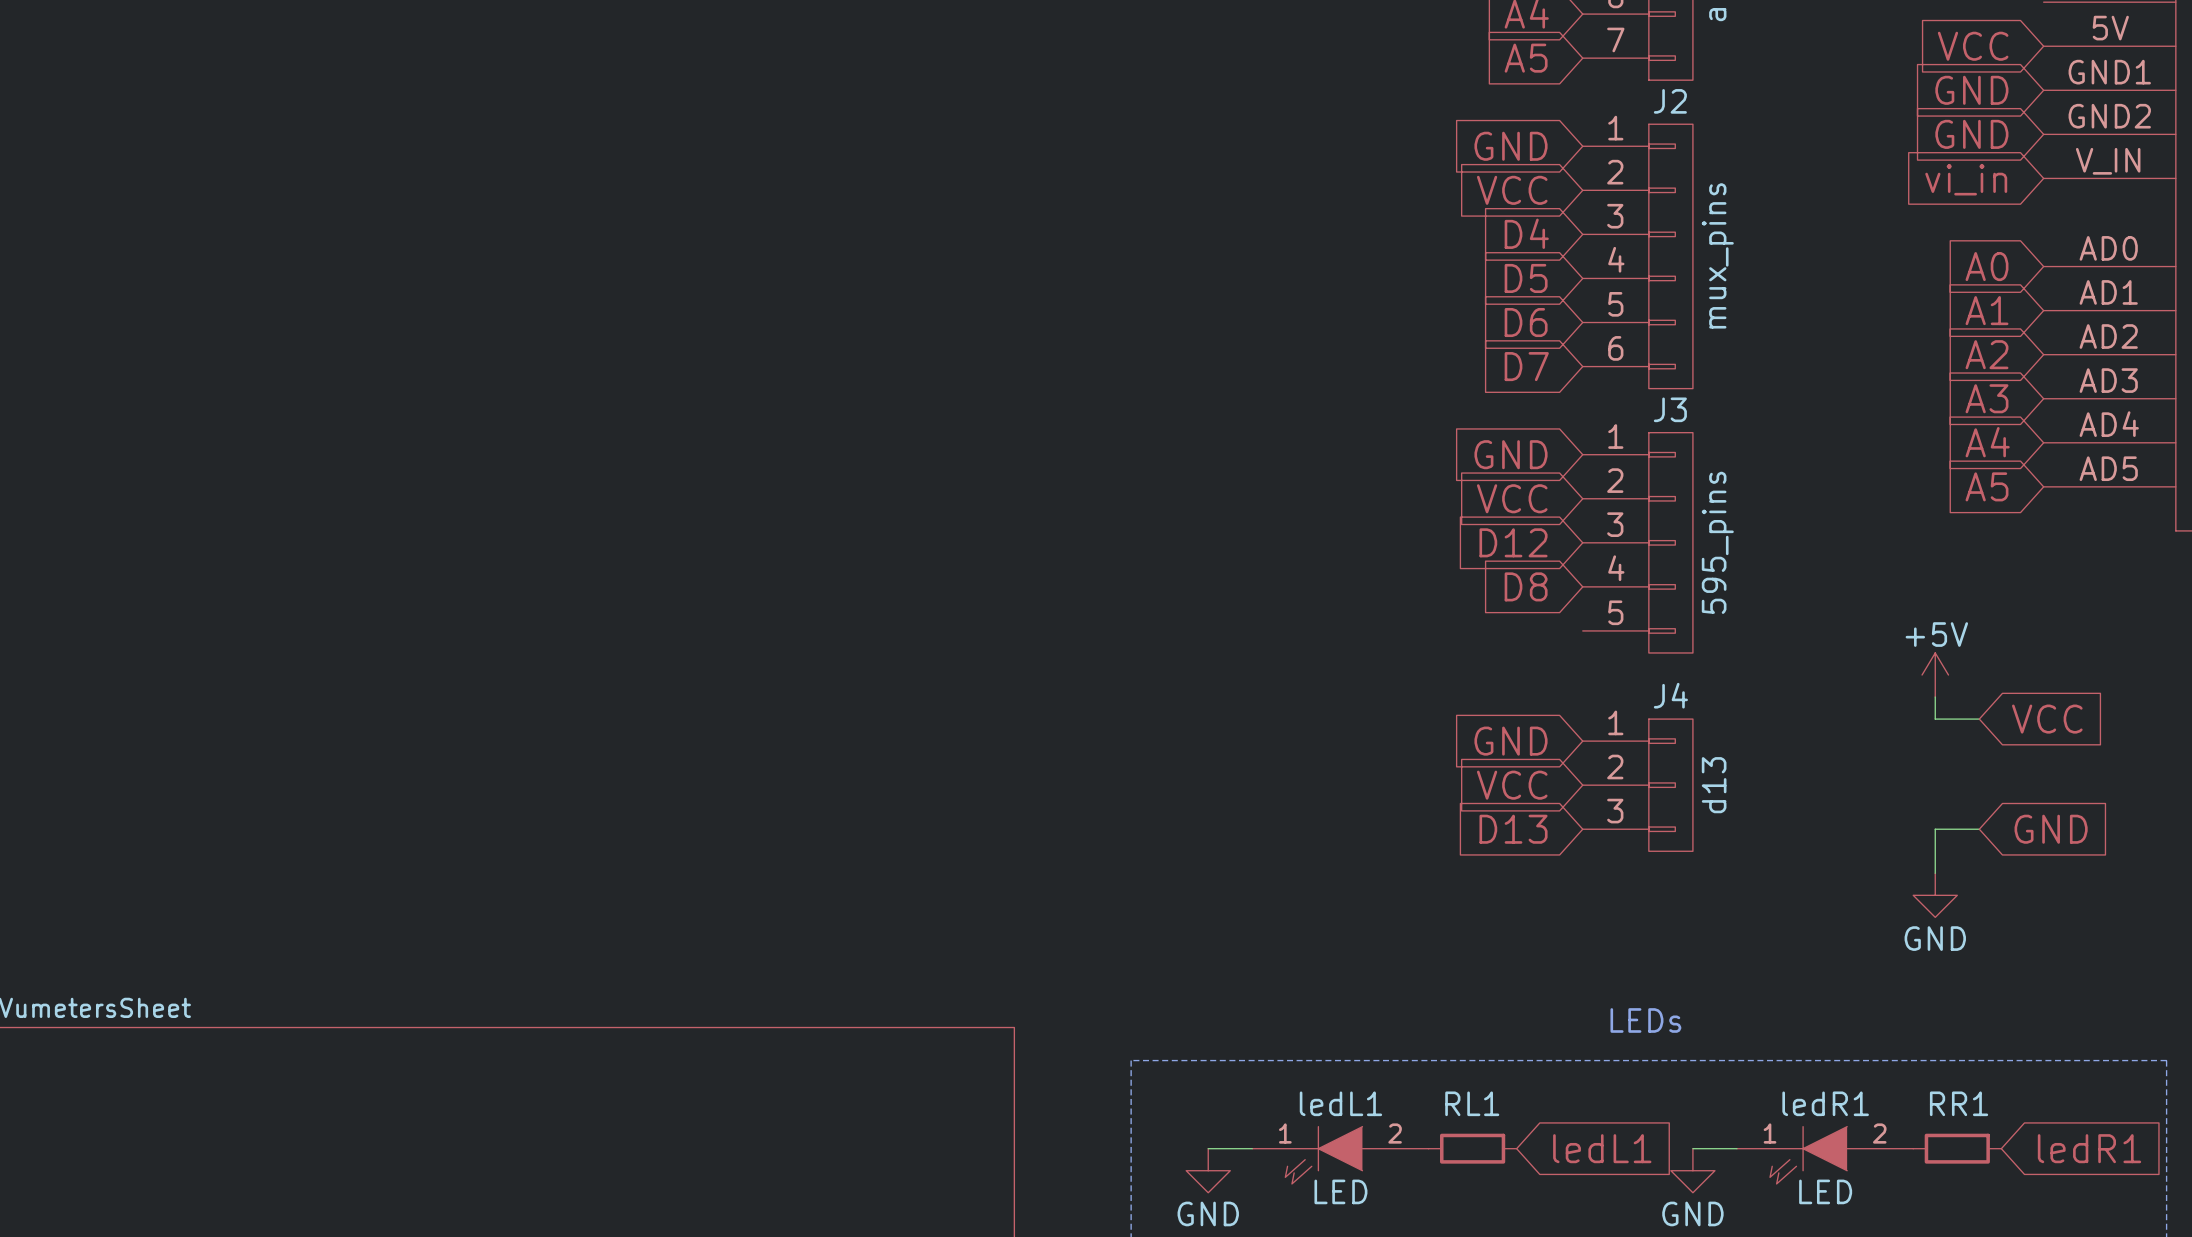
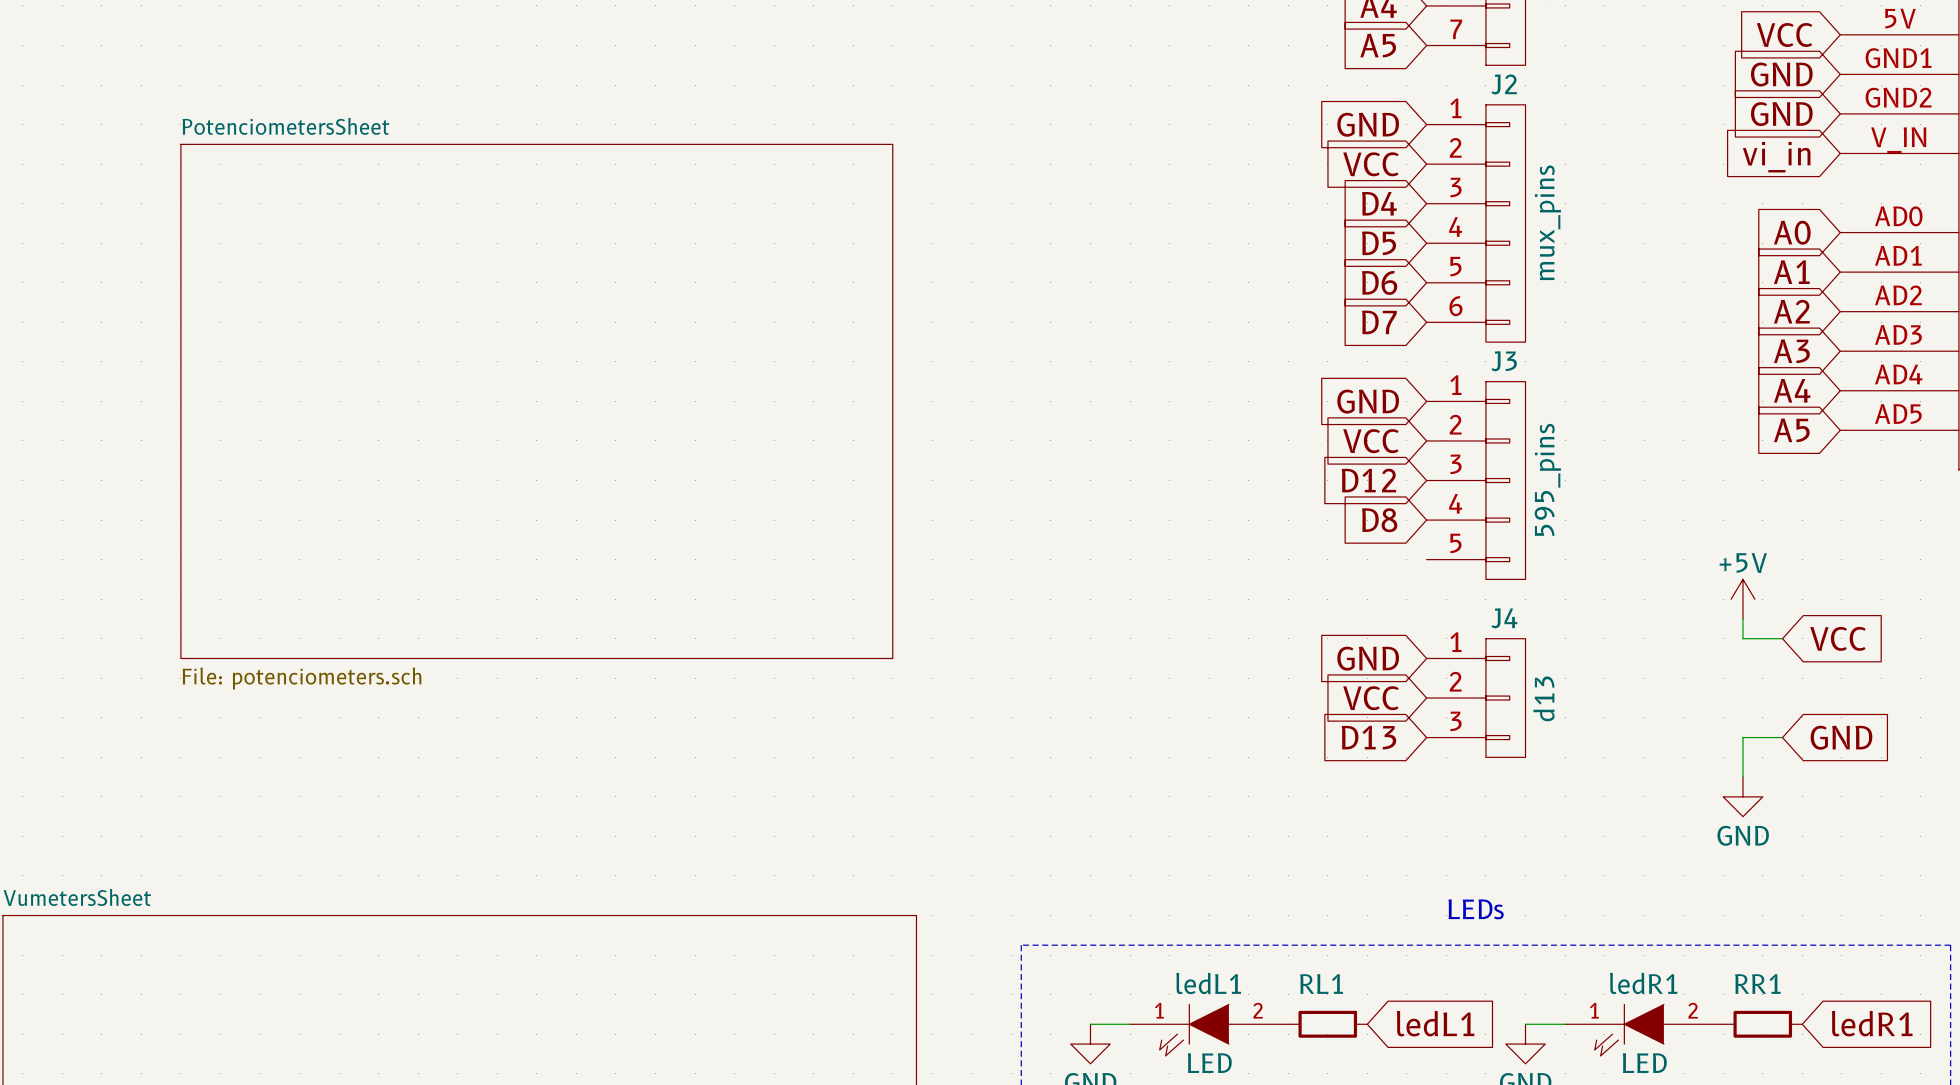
sheet PotenciometersSheet: none -> File: potenciometers.sch (536, 401)

